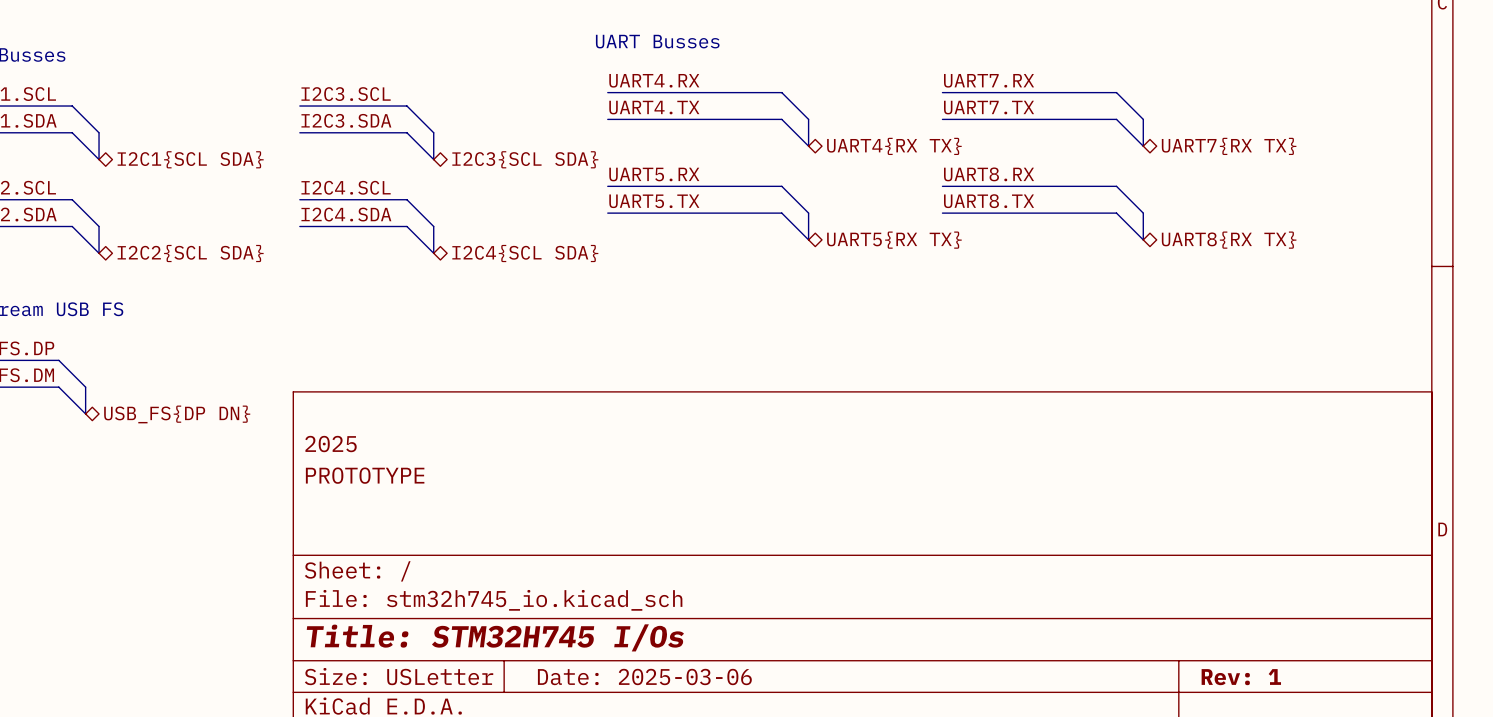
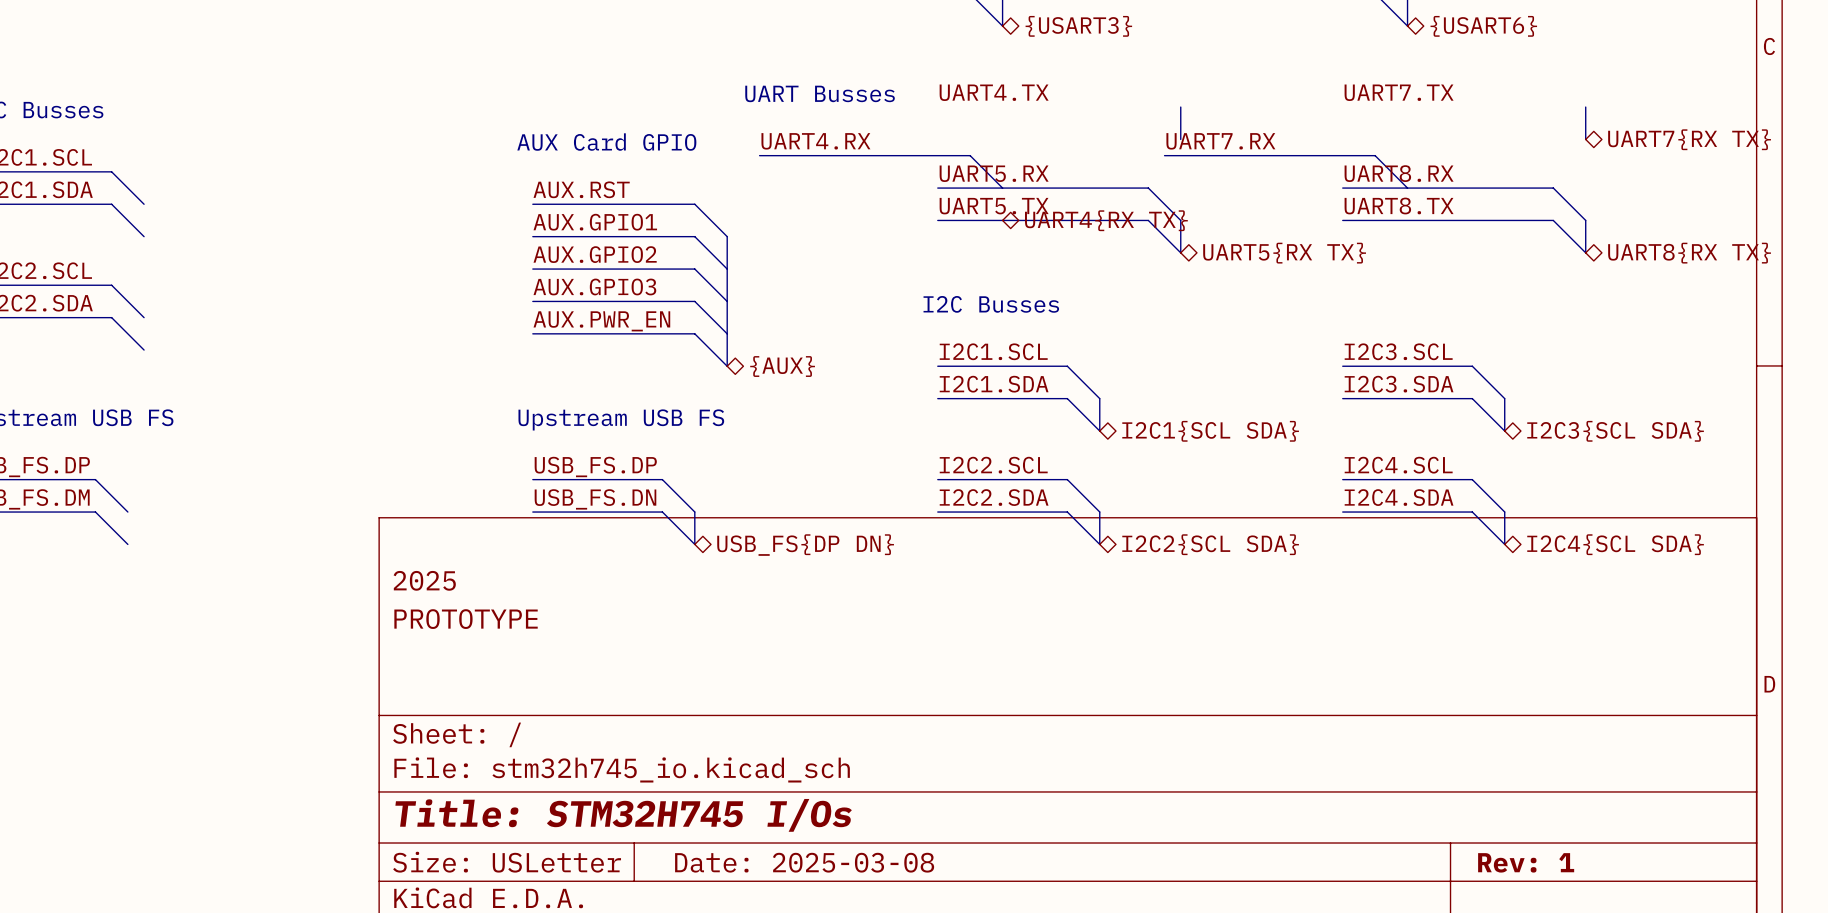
text: none -> AUX Card GPIO (606, 142)
label: I2C3.SCL (346, 94) -> none
wire: (299, 106) (406, 106) (433, 132) -> none
label position: UART4.TX (654, 107) -> UART4.TX (994, 92)
label position: UART7.TX (989, 107) -> UART7.TX (1399, 92)
wire: (607, 119) (755, 119) -> none
wire: (781, 119) (808, 146) -> (970, 188) (1148, 188) (1180, 220)
bus: (808, 119) (808, 146) -> (1180, 107) (1180, 139)
wire: (942, 119) (1089, 119) -> none
wire: (1116, 119) (1143, 146) -> (1375, 188) (1553, 188) (1585, 220)
bus: (1143, 119) (1143, 146) -> (1585, 107) (1585, 139)
label: I2C3.SDA (346, 120) -> none
label: none -> AUX.RST (581, 189)
bus: (99, 132) (99, 159) -> none
wire: (299, 132) (406, 132) (433, 159) -> none
wire: none -> (532, 204) (694, 204) (727, 236)
bus: (433, 132) (433, 159) -> none
hierarchical label position: UART7{RX TX} (1229, 146) -> UART7{RX TX} (1689, 139)
label: none -> AUX.GPIO1 (595, 222)
hierarchical label: I2C1{SCL SDA} (190, 159) -> none
wire: none -> (532, 236) (694, 236) (727, 269)
hierarchical label: I2C3{SCL SDA} (525, 159) -> none
bus: none -> (727, 236) (727, 366)
label: none -> AUX.GPIO2 (595, 254)
label position: UART5.RX (654, 174) -> UART5.RX (994, 173)
label position: UART8.RX (989, 174) -> UART8.RX (1399, 173)
wire: none -> (532, 269) (694, 269) (727, 301)
wire: (607, 186) (781, 186) (808, 213) -> (937, 220) (1148, 220) (1180, 252)
wire: (942, 186) (1116, 186) (1143, 213) -> (1342, 220) (1553, 220) (1585, 252)
label: I2C4.SCL (346, 187) -> none
wire: (299, 199) (406, 199) (433, 226) -> (532, 479) (662, 479) (694, 512)
label: none -> AUX.GPIO3 (594, 286)
label position: UART5.TX (654, 201) -> UART5.TX (994, 206)
label position: UART8.TX (989, 201) -> UART8.TX (1399, 206)
wire: none -> (532, 301) (694, 301) (727, 333)
wire: (607, 213) (781, 213) (808, 239) -> none
bus: (808, 213) (808, 239) -> (1180, 220) (1180, 252)
wire: (942, 213) (1116, 213) (1143, 239) -> none
bus: (1143, 213) (1143, 239) -> (1585, 220) (1585, 252)
label: I2C4.SDA (346, 214) -> none
text: none -> I2C Busses (991, 304)
bus: (99, 226) (99, 253) -> none
wire: (299, 226) (406, 226) (433, 253) -> (532, 512) (662, 512) (694, 544)
bus: (433, 226) (433, 253) -> (694, 512) (694, 544)
label: none -> AUX.PWR_EN (601, 321)
wire: none -> (532, 333) (694, 333) (727, 366)
hierarchical label position: UART5{RX TX} (894, 240) -> UART5{RX TX} (1284, 253)
hierarchical label position: UART8{RX TX} (1229, 240) -> UART8{RX TX} (1689, 253)
hierarchical label: I2C2{SCL SDA} (190, 253) -> none
hierarchical label: I2C4{SCL SDA} (525, 253) -> none
label: none -> I2C1.SCL (993, 351)
label: none -> I2C3.SCL (1398, 351)
hierarchical label: none -> {AUX} (782, 366)
wire: none -> (937, 366) (1067, 366) (1099, 398)
wire: none -> (1342, 366) (1472, 366) (1504, 398)
label: none -> I2C1.SDA (994, 384)
label: none -> I2C3.SDA (1399, 384)
wire: none -> (937, 398) (1067, 398) (1099, 431)
bus: none -> (1099, 398) (1099, 431)
wire: none -> (1342, 398) (1472, 398) (1504, 431)
bus: none -> (1504, 398) (1504, 431)
text: none -> Upstream USB FS (621, 419)
hierarchical label: none -> I2C1{SCL SDA} (1210, 431)
hierarchical label: none -> I2C3{SCL SDA} (1615, 431)
label: none -> I2C2.SCL (993, 465)
label: none -> I2C4.SCL (1398, 465)
label: none -> USB_FS.DP (595, 466)
wire: none -> (937, 479) (1067, 479) (1099, 512)
wire: none -> (1342, 479) (1472, 479) (1504, 512)
label: none -> I2C2.SDA (994, 497)
label: none -> I2C4.SDA (1399, 497)
label: none -> USB_FS.DN (595, 499)
bus: (85, 387) (85, 413) -> none
wire: none -> (937, 512) (1067, 512) (1099, 544)
bus: none -> (1099, 512) (1099, 544)
wire: none -> (1342, 512) (1472, 512) (1504, 544)
bus: none -> (1504, 512) (1504, 544)
hierarchical label: USB_FS{DP DN} (177, 414) -> none
hierarchical label: none -> USB_FS{DP DN} (805, 545)
hierarchical label: none -> I2C2{SCL SDA} (1210, 544)
hierarchical label: none -> I2C4{SCL SDA} (1615, 544)
title block: Date: 2025-03-06 (644, 676) -> Date: 2025-03-08 (804, 862)

